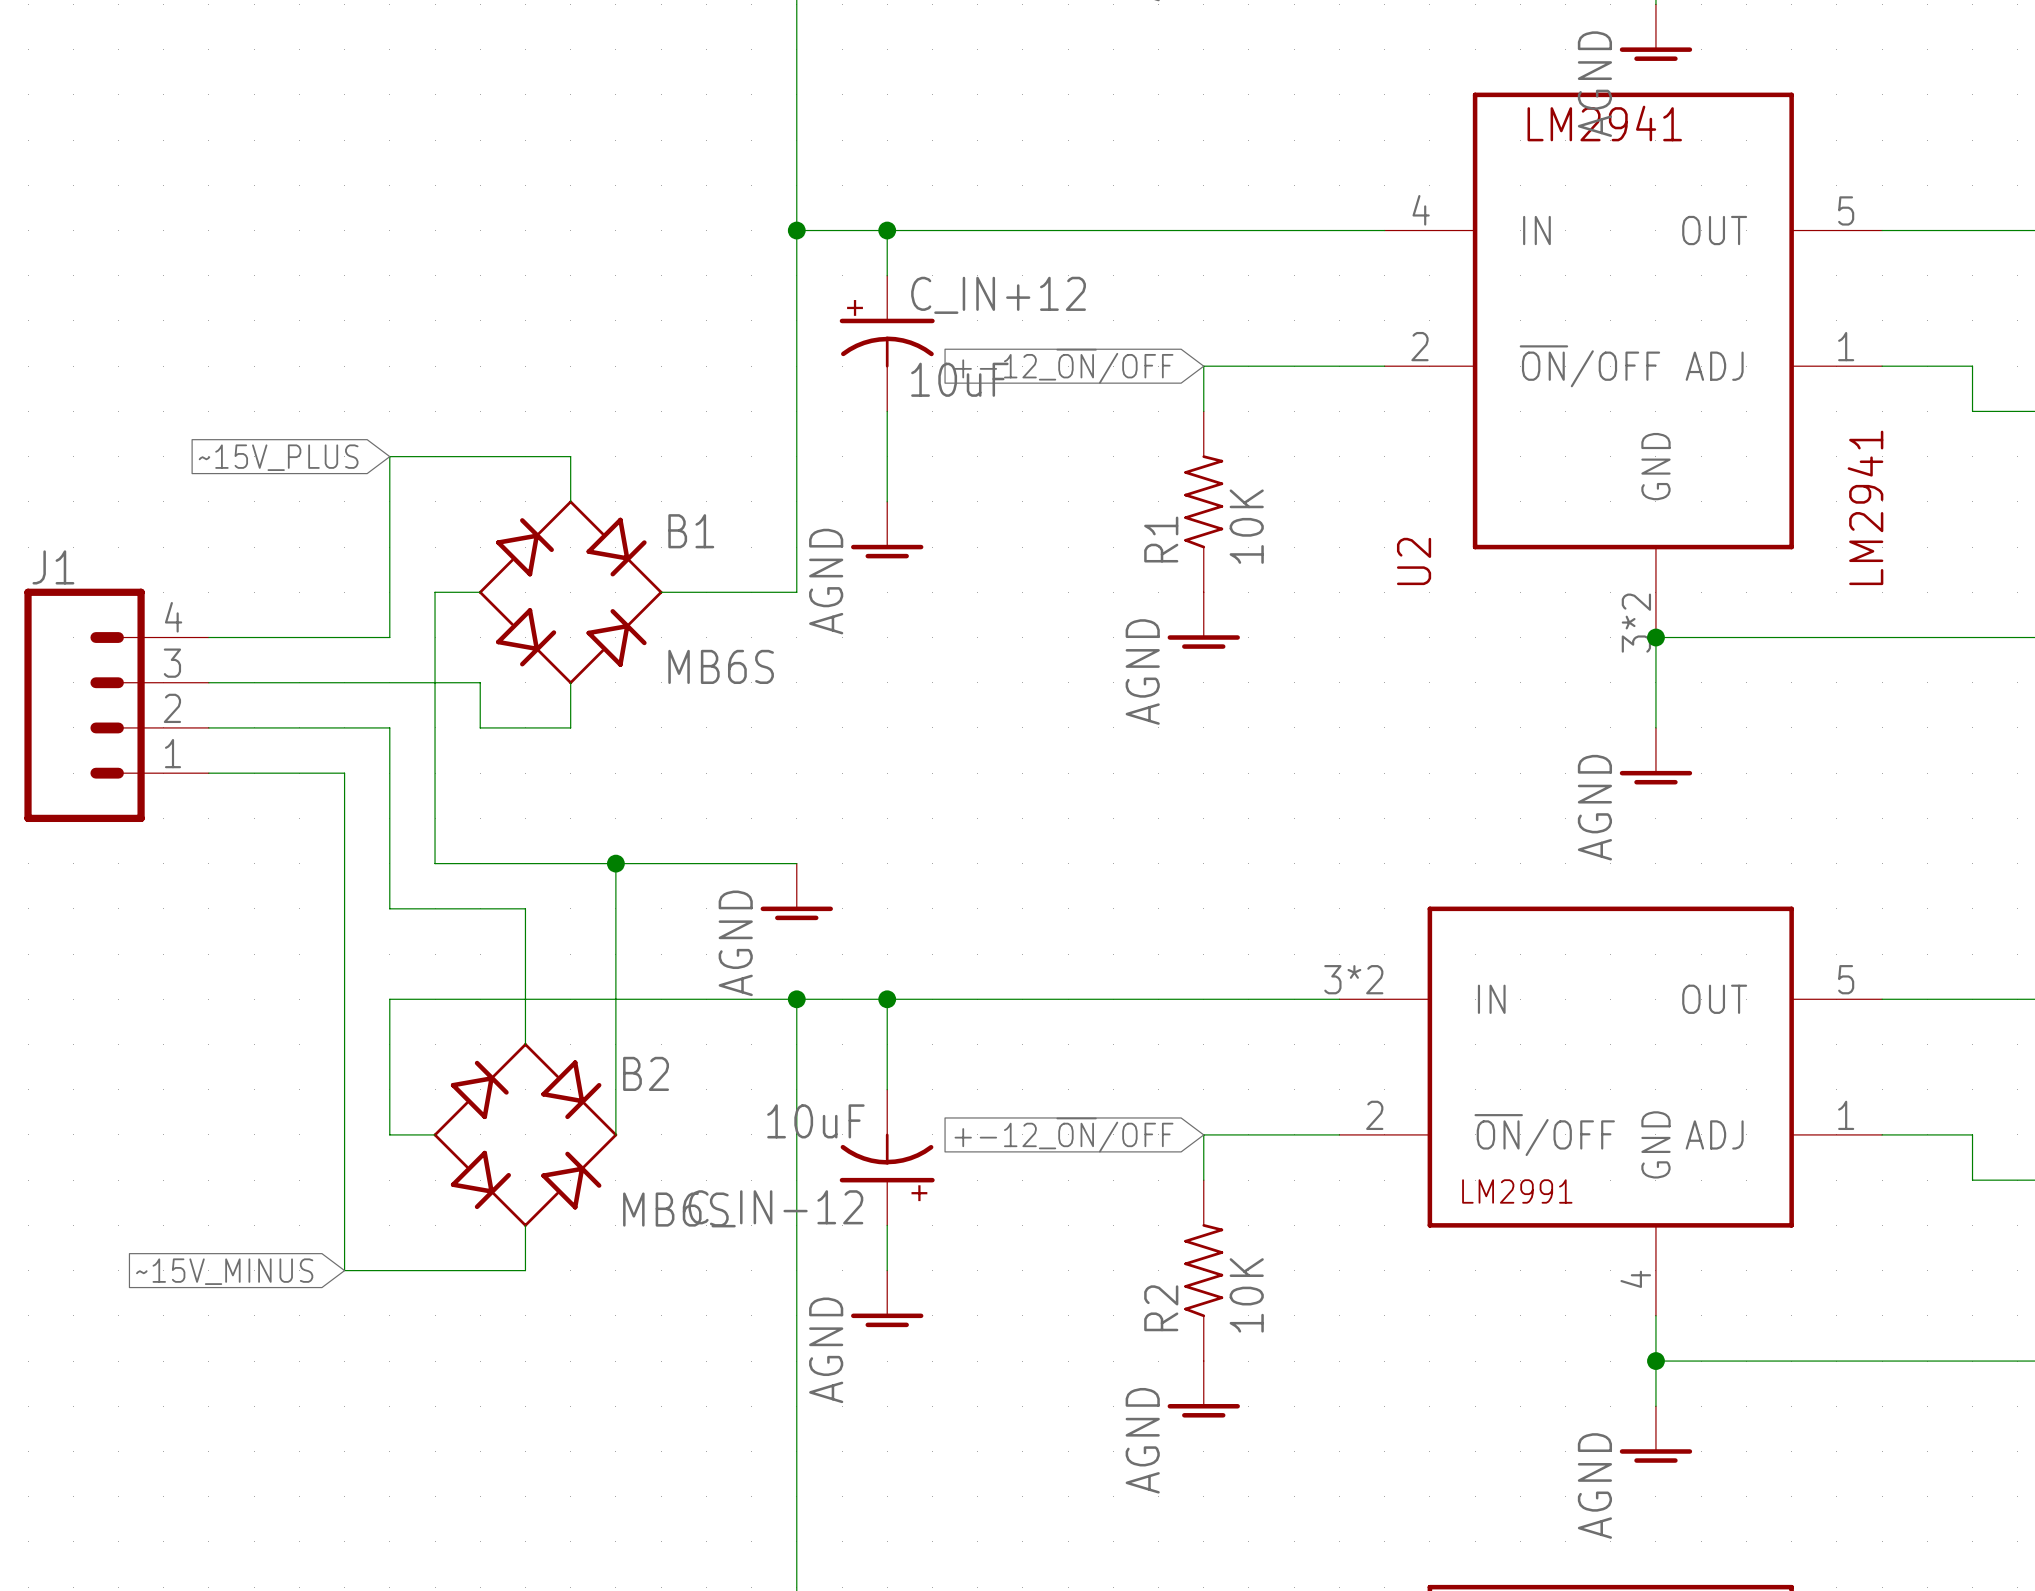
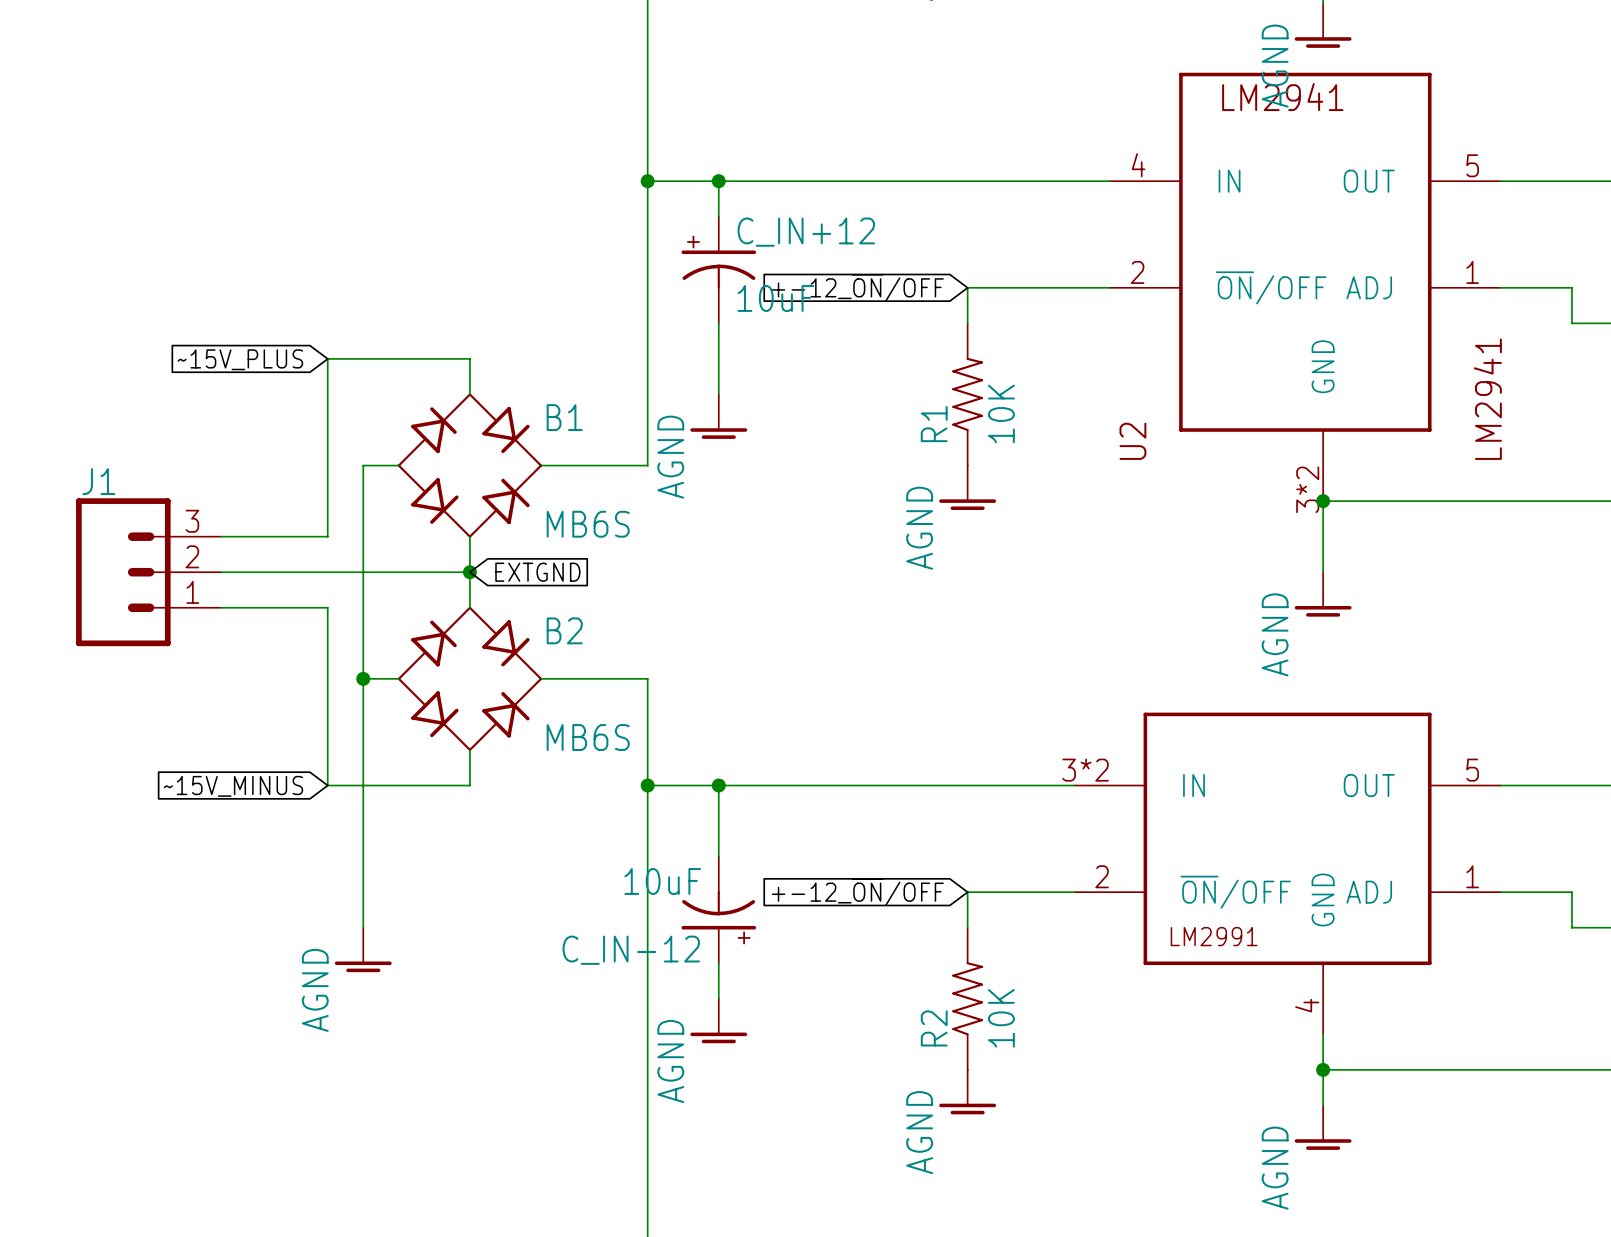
J1 symbol: [24, 588, 209, 823] -> [76, 498, 222, 647]
wire: (208, 637) (389, 637) -> (327, 536) (327, 501)
wire: (389, 682) (480, 682) (480, 727) -> (327, 572) (398, 572)
wire: (389, 727) (389, 773) -> (292, 607) (327, 607)
junction: none -> (469, 572)
wire: none -> (473, 572) (469, 572) (469, 607)
global label: none -> EXTGND (537, 572)
wire: (344, 773) (344, 1270) (525, 1270) (525, 1225) -> none
wire: none -> (363, 678) (363, 927)
junction: none -> (363, 678)
wire: (480, 863) (661, 863) -> none
wire: (615, 863) (615, 1134) -> none
junction: (615, 863) -> none
wire: none -> (647, 678) (647, 785)
power symbol: AGND (796, 891) -> none
wire: (389, 908) (525, 908) (525, 1044) -> (327, 714) (327, 785)
wire: (389, 999) (389, 1134) (435, 1134) -> none
wire: (570, 999) (796, 999) -> (469, 785) (469, 749)
B2 position: (525, 1134) -> (469, 678)
power symbol: none -> AGND (363, 949)
global label position: ~15V_MINUS (224, 1271) -> ~15V_MINUS (233, 786)

